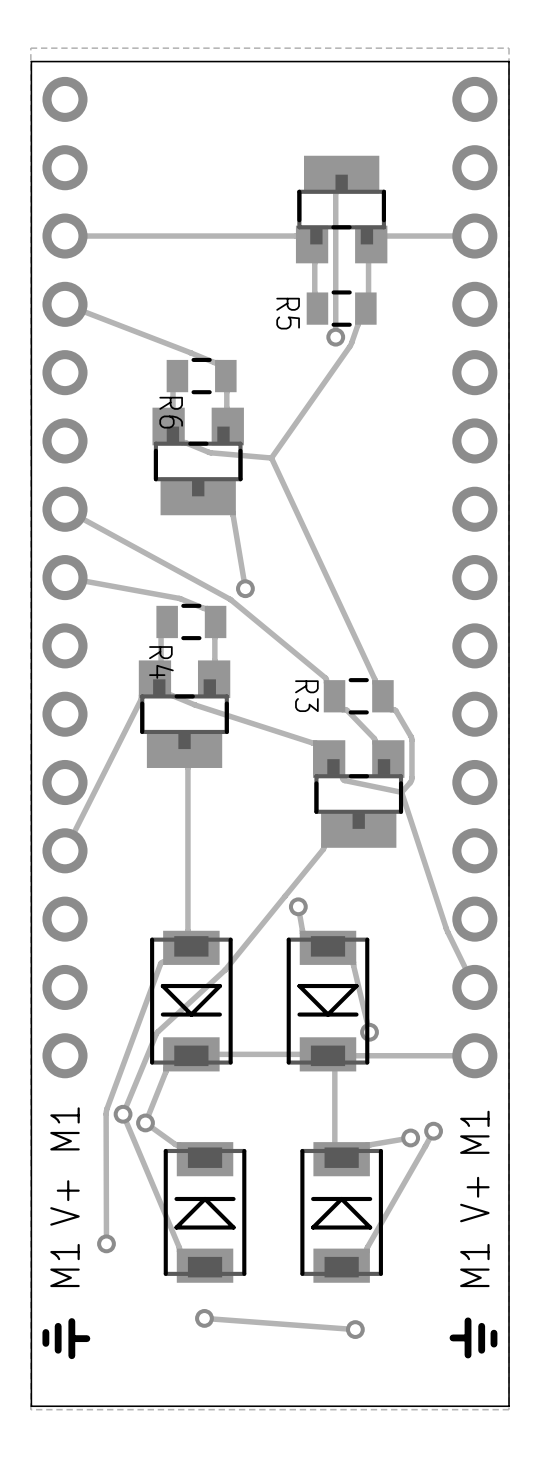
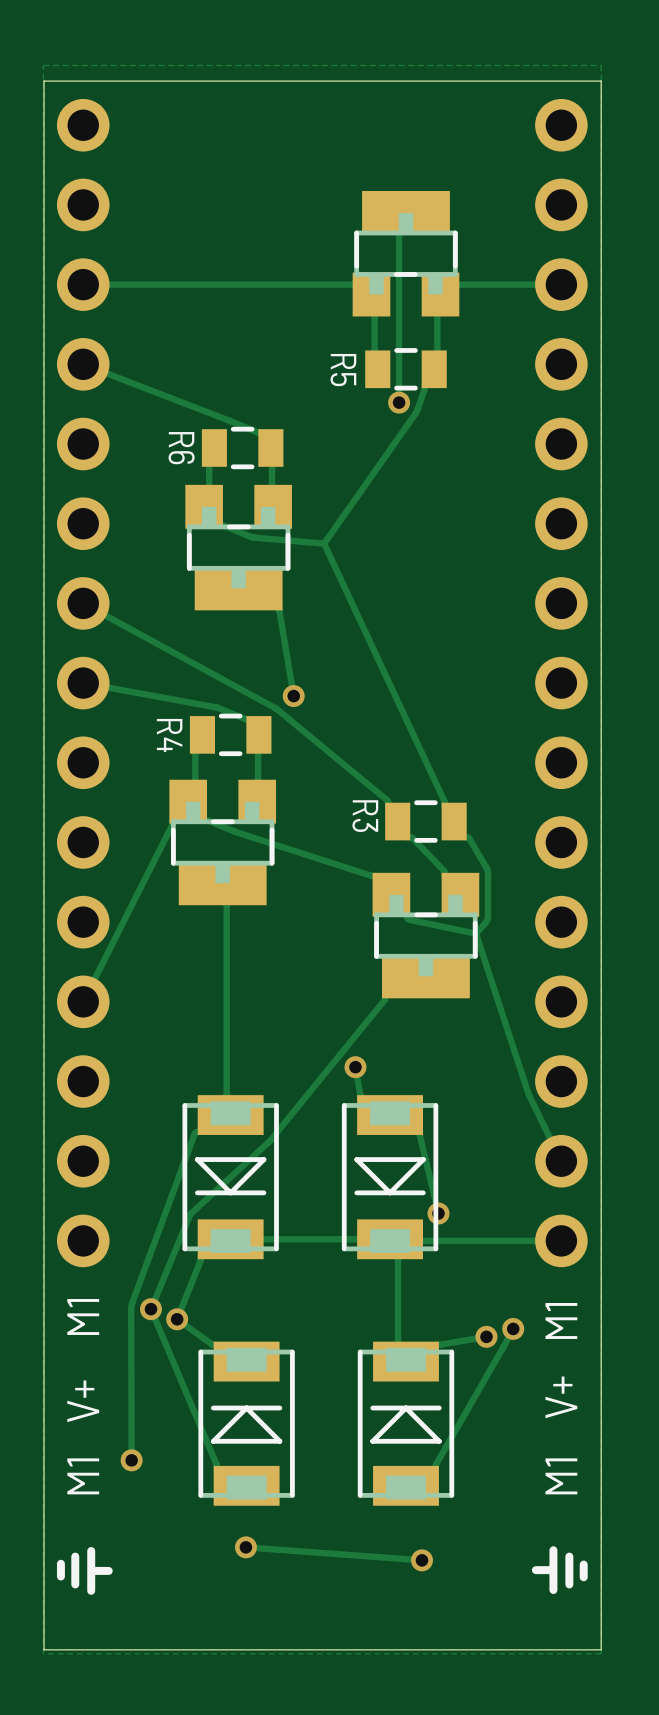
R6 name position: R6 (171, 412) -> R6 (181, 448)
R4 name position: R4 (161, 662) -> R4 (169, 735)

